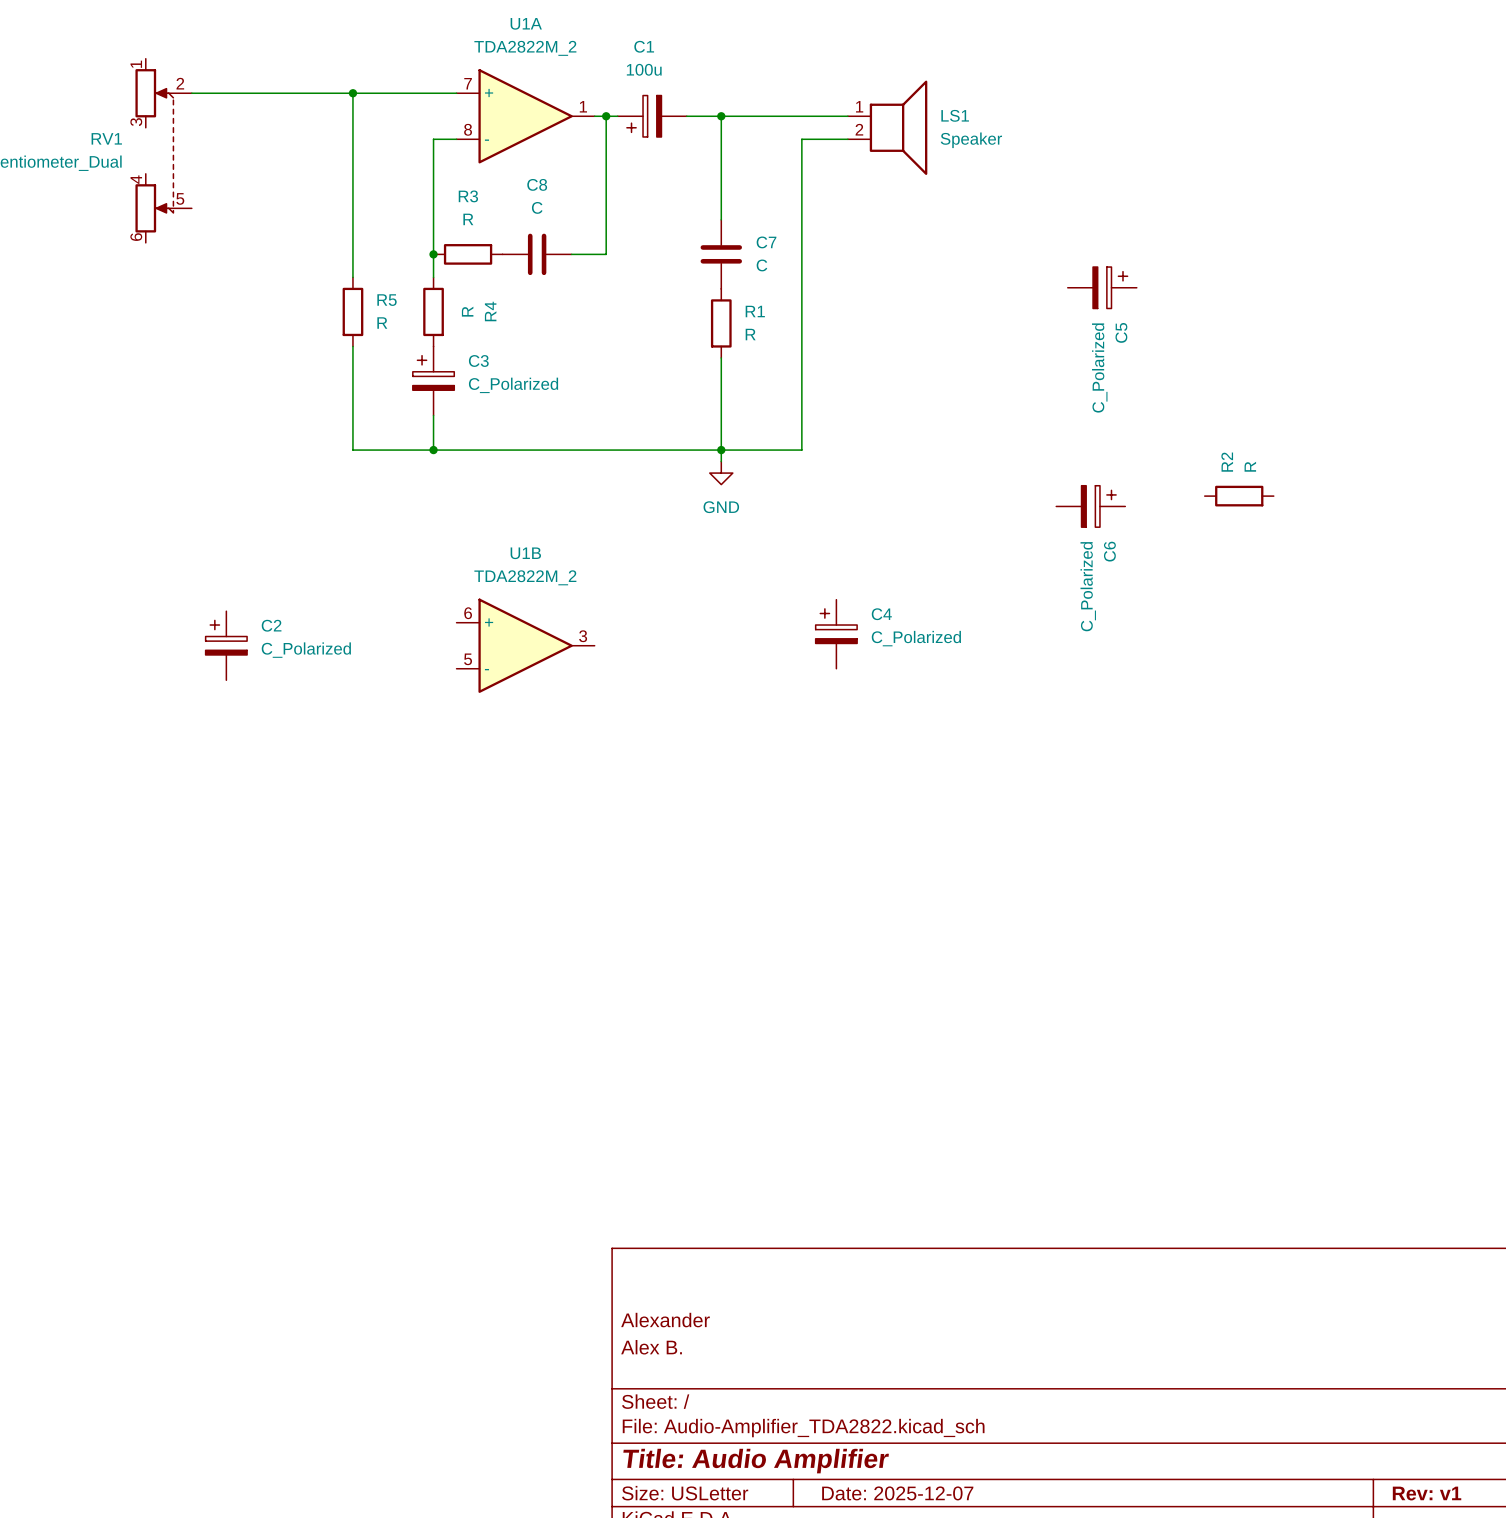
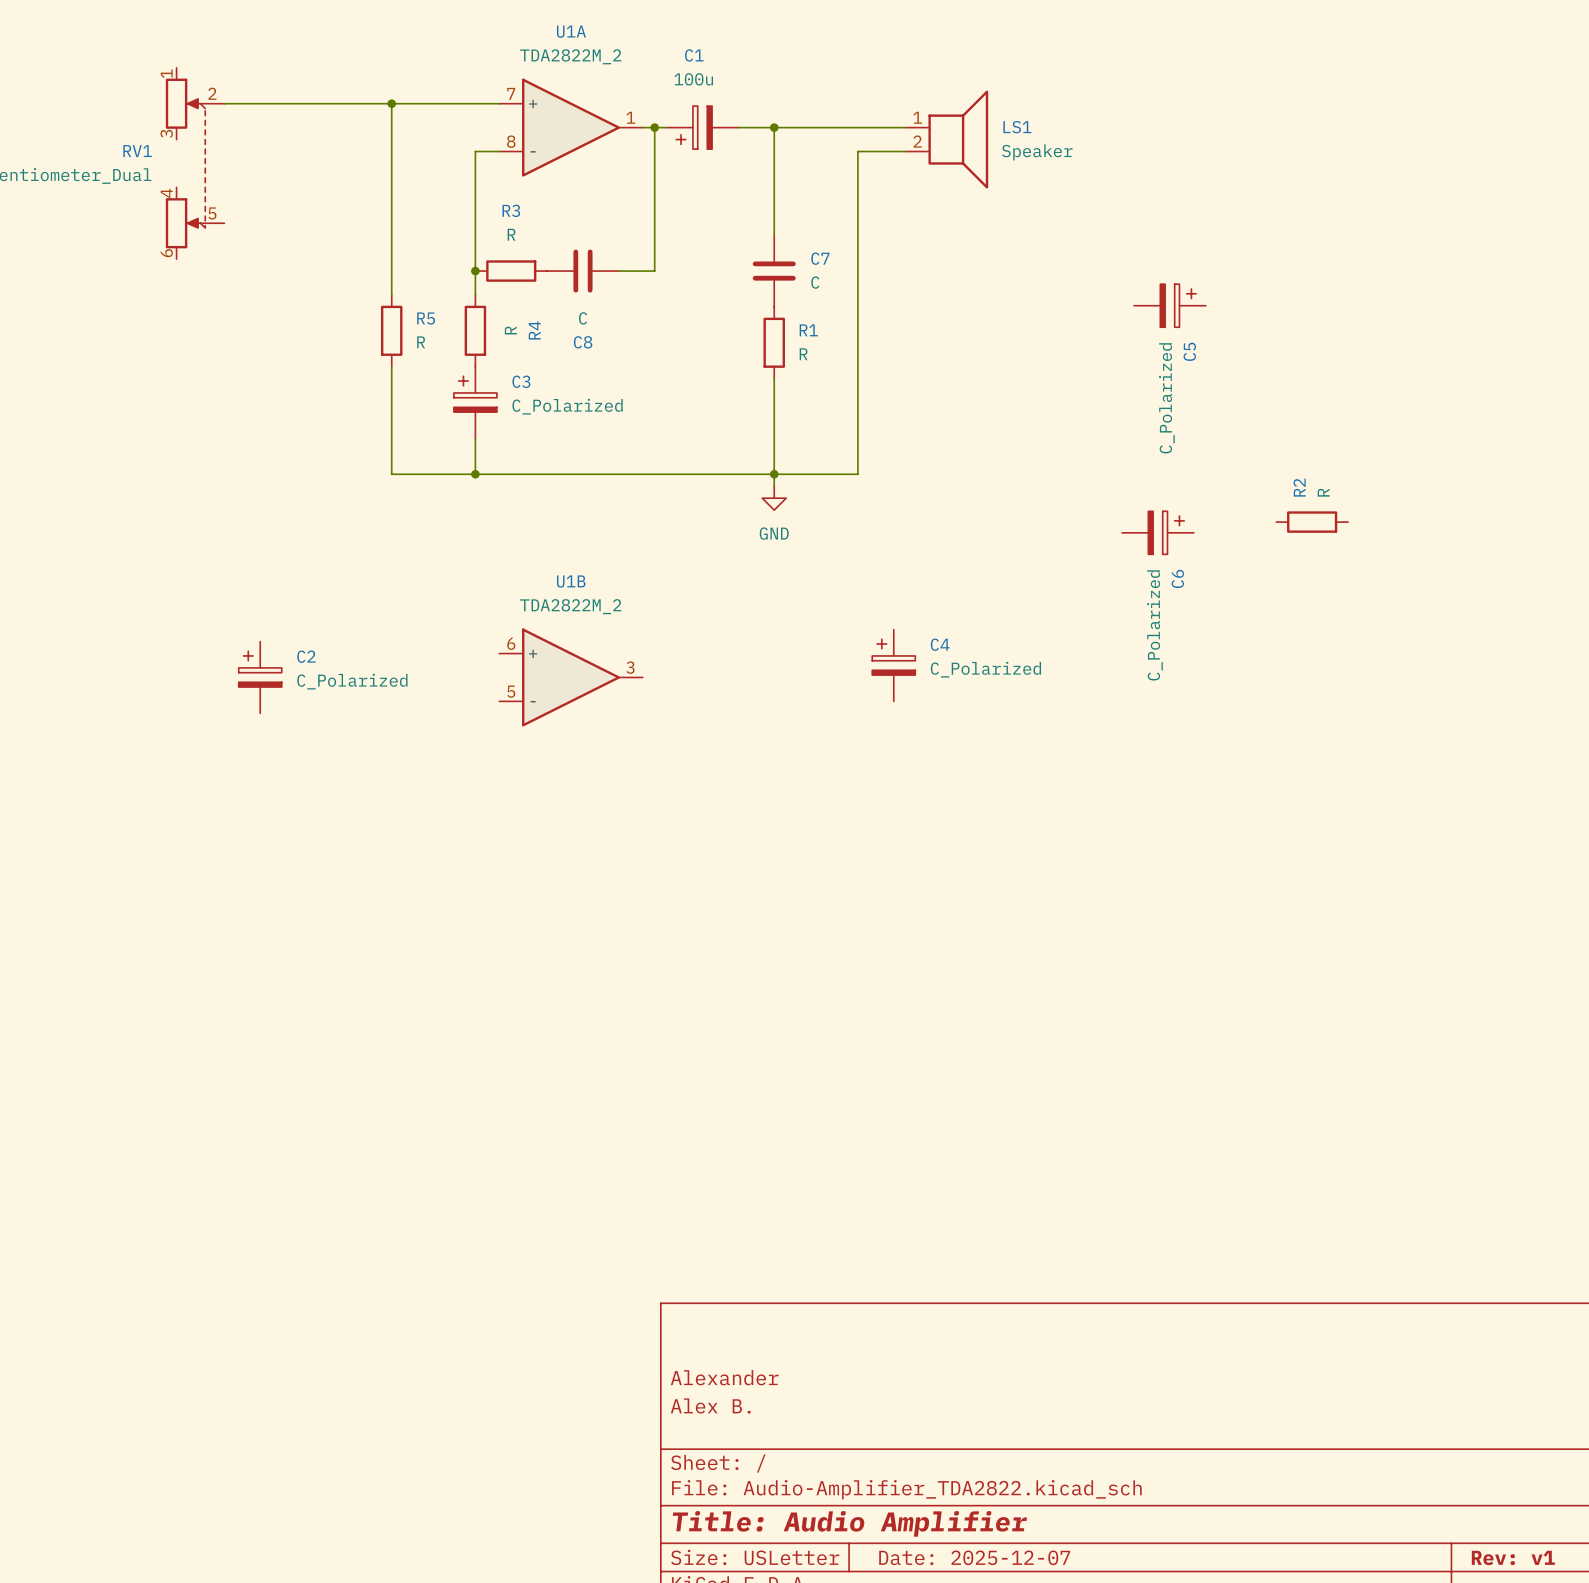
C8 name position: C8 (537, 184) -> C8 (583, 342)
C8 value position: C (537, 207) -> C (583, 318)

